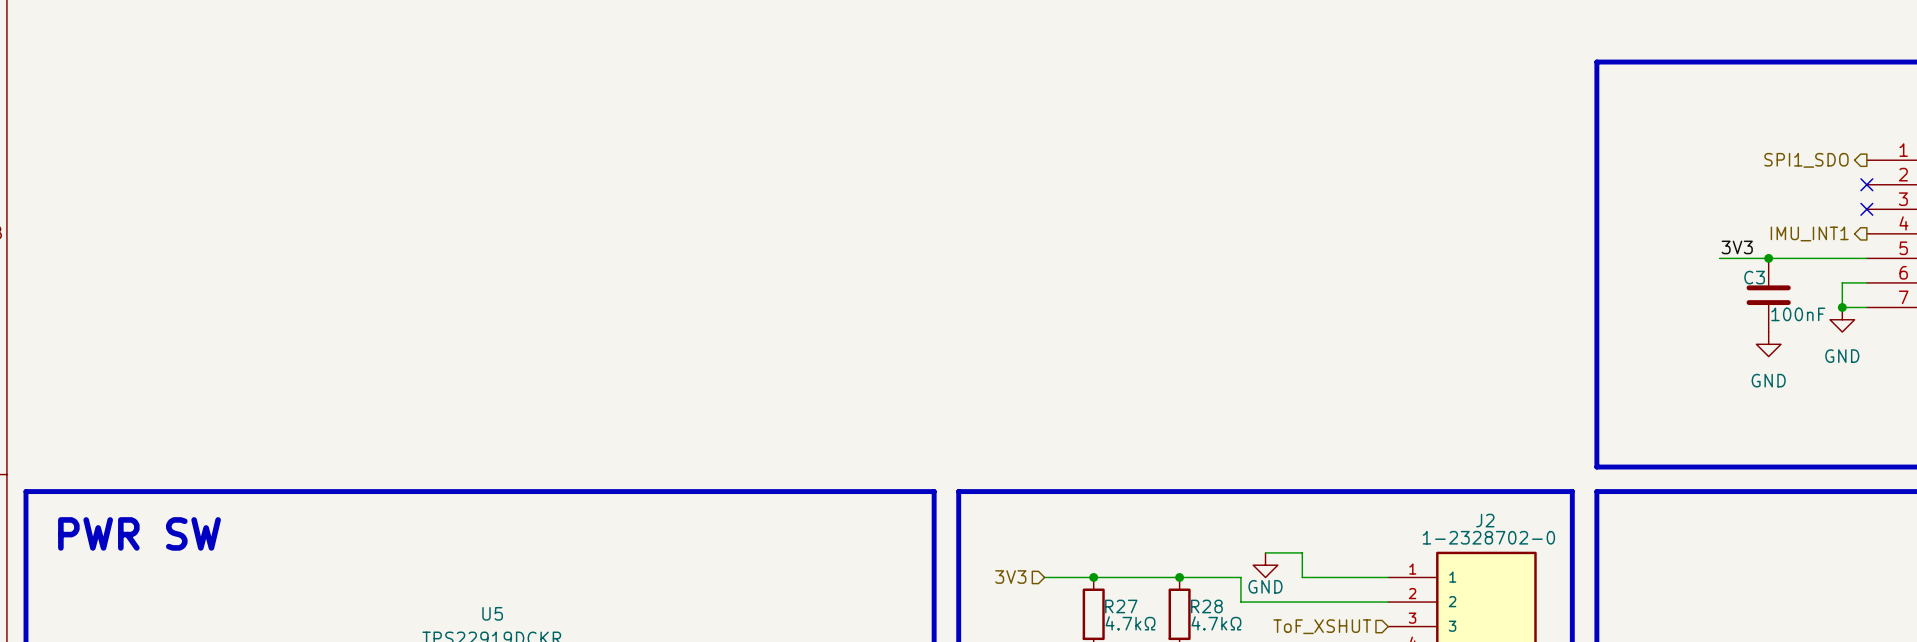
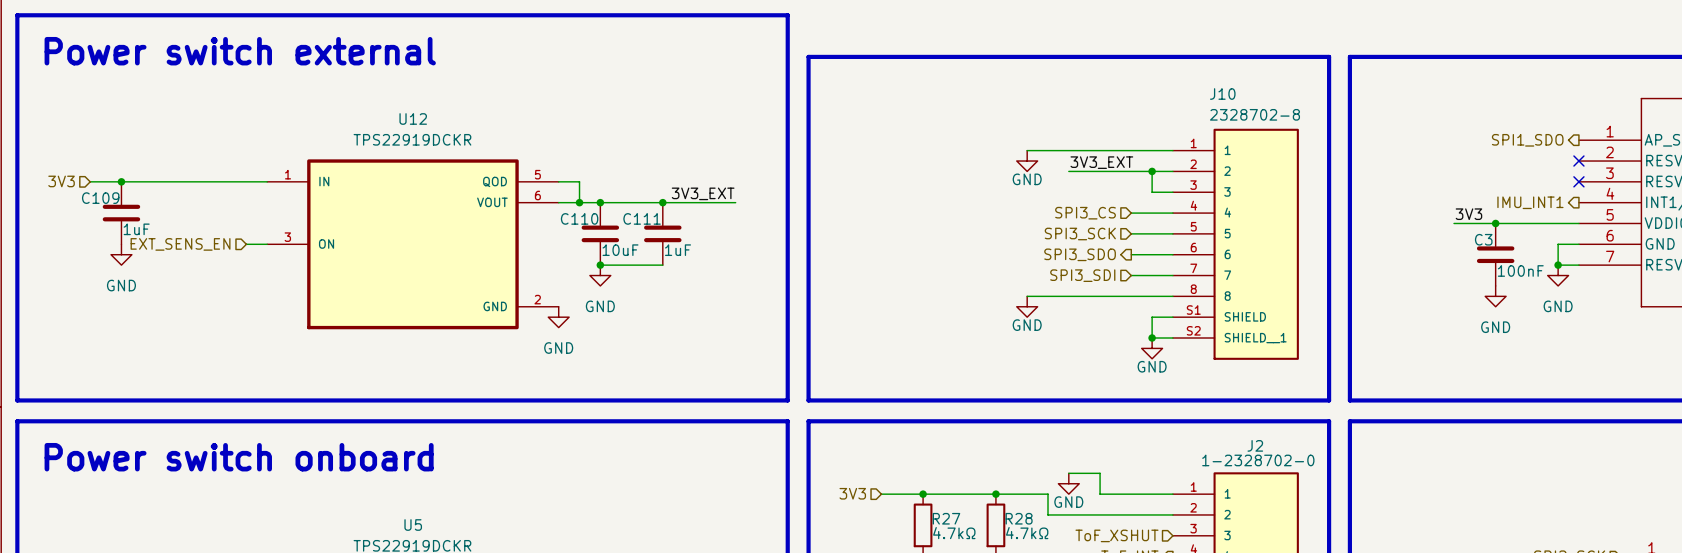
line: none -> (17, 15) (787, 15) (787, 400) (17, 400) (17, 15)
text: none -> Power switch external (240, 51)
line: none -> (808, 56) (1329, 56) (1329, 400) (808, 400) (808, 56)
wire: none -> (1027, 150) (1172, 150)
power symbol: none -> GND (1027, 161)
label: none -> 3V3_EXT (1101, 162)
wire: none -> (1068, 171) (1172, 171)
wire: none -> (1152, 171) (1152, 192) (1172, 192)
junction: none -> (1152, 171)
hierarchical label: none -> 3V3 (61, 181)
wire: none -> (90, 181) (267, 181)
junction: none -> (121, 181)
wire: none -> (558, 181) (579, 181) (579, 202)
label: none -> 3V3_EXT (703, 193)
wire: none -> (558, 202) (735, 202)
junction: none -> (579, 202)
junction: none -> (600, 202)
junction: none -> (662, 202)
C109: none -> 1uF (121, 213)
hierarchical label: none -> SPI3_CS (1085, 213)
wire: none -> (1131, 213) (1172, 213)
C110: none -> 10uF (600, 233)
C111: none -> 1uF (662, 233)
hierarchical label: none -> SPI3_SCK (1080, 234)
wire: none -> (1131, 233) (1172, 233)
wire: none -> (246, 244) (267, 244)
U12: none -> TPS22919DCKR (412, 244)
J10: none -> 2328702-8 (1235, 244)
hierarchical label: none -> EXT_SENS_EN (180, 244)
power symbol: none -> GND (121, 254)
hierarchical label: none -> SPI3_SDO (1080, 254)
wire: none -> (1131, 254) (1172, 254)
wire: none -> (600, 265) (662, 265)
junction: none -> (600, 265)
power symbol: none -> GND (600, 275)
hierarchical label: none -> SPI3_SDI (1082, 275)
wire: none -> (1131, 275) (1172, 275)
wire: none -> (1027, 296) (1172, 296)
power symbol: none -> GND (1027, 306)
power symbol: none -> GND (558, 317)
wire: none -> (1172, 317) (1152, 317) (1152, 338) (1172, 338)
junction: none -> (1152, 338)
power symbol: none -> GND (1152, 348)
text: PWR SW (139, 533) -> Power switch onboard (239, 457)

